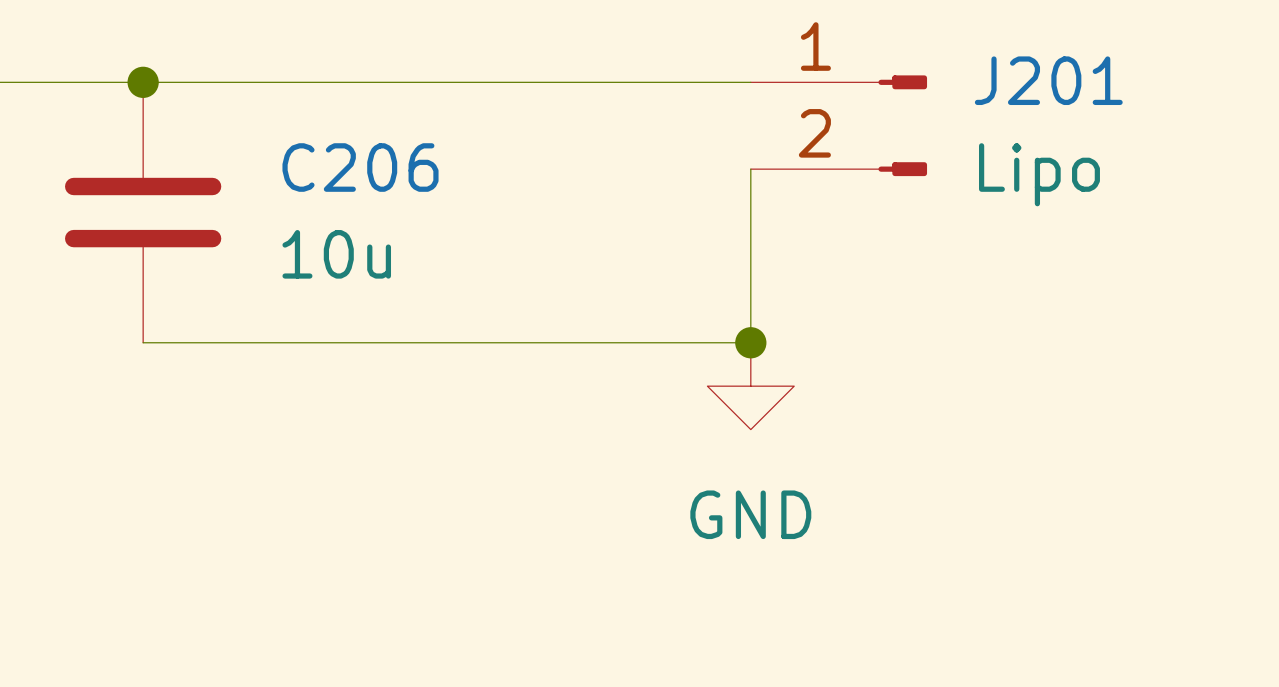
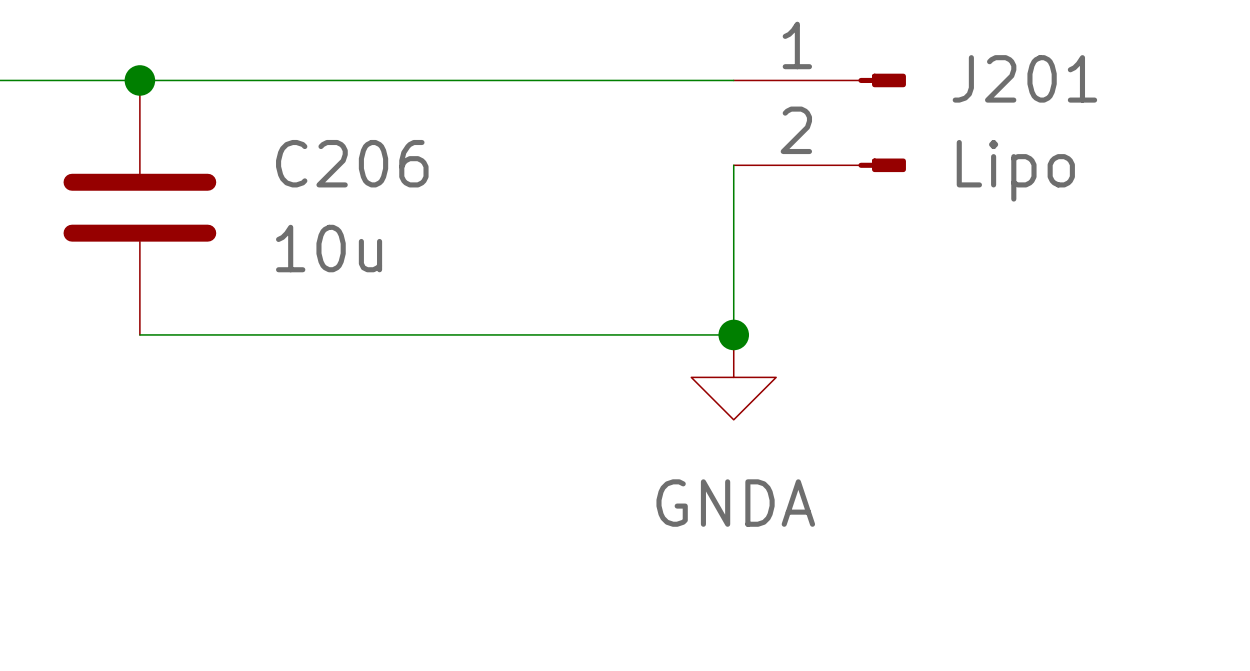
power symbol: GND (750, 386) -> GNDA (733, 377)

